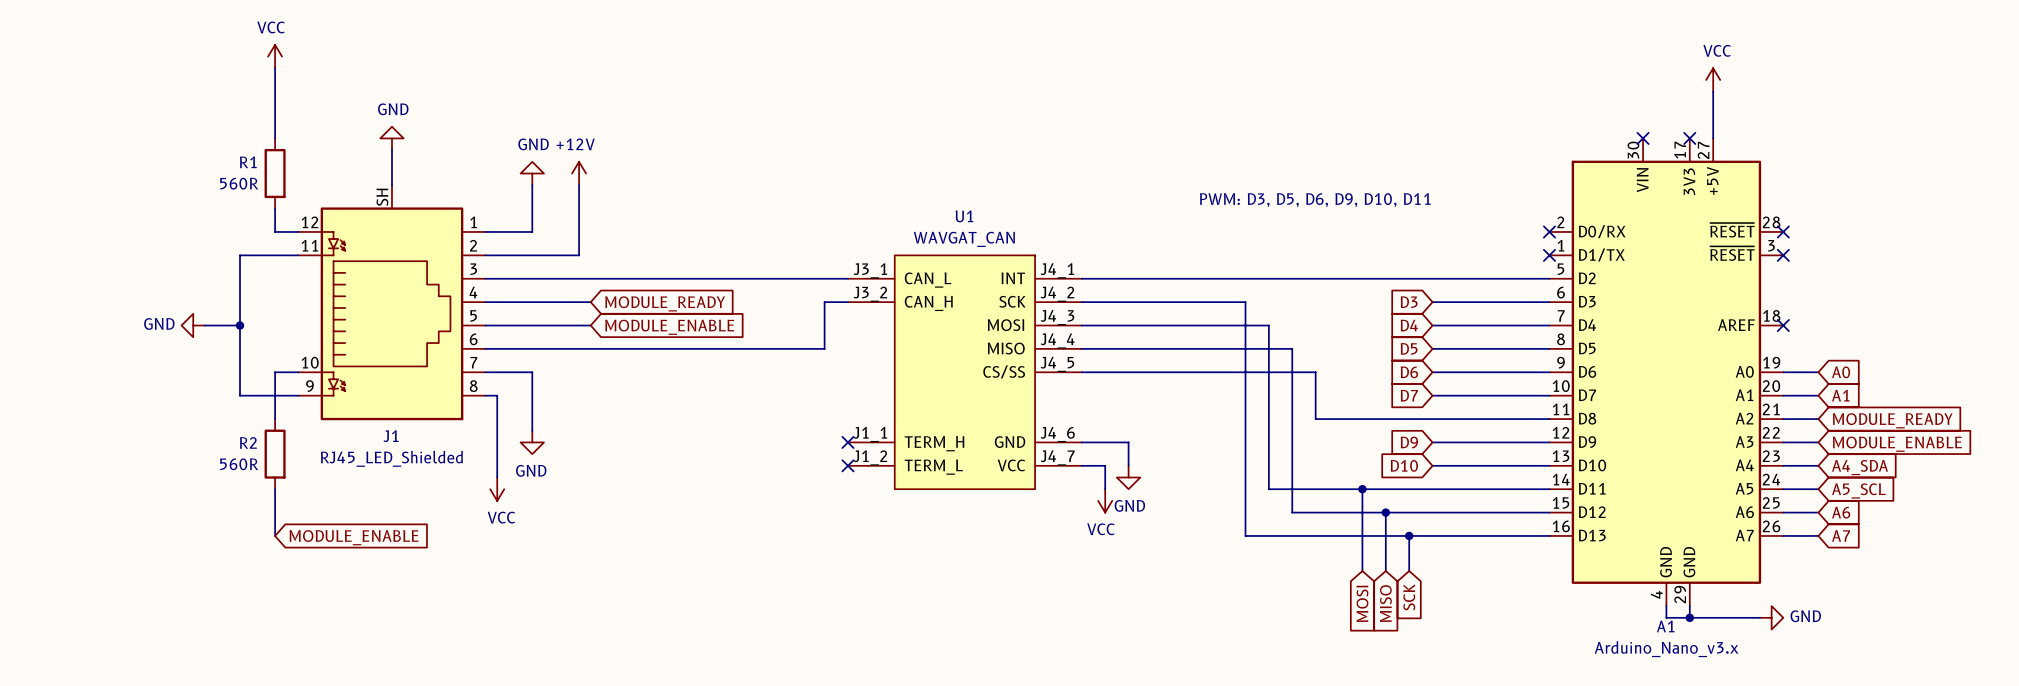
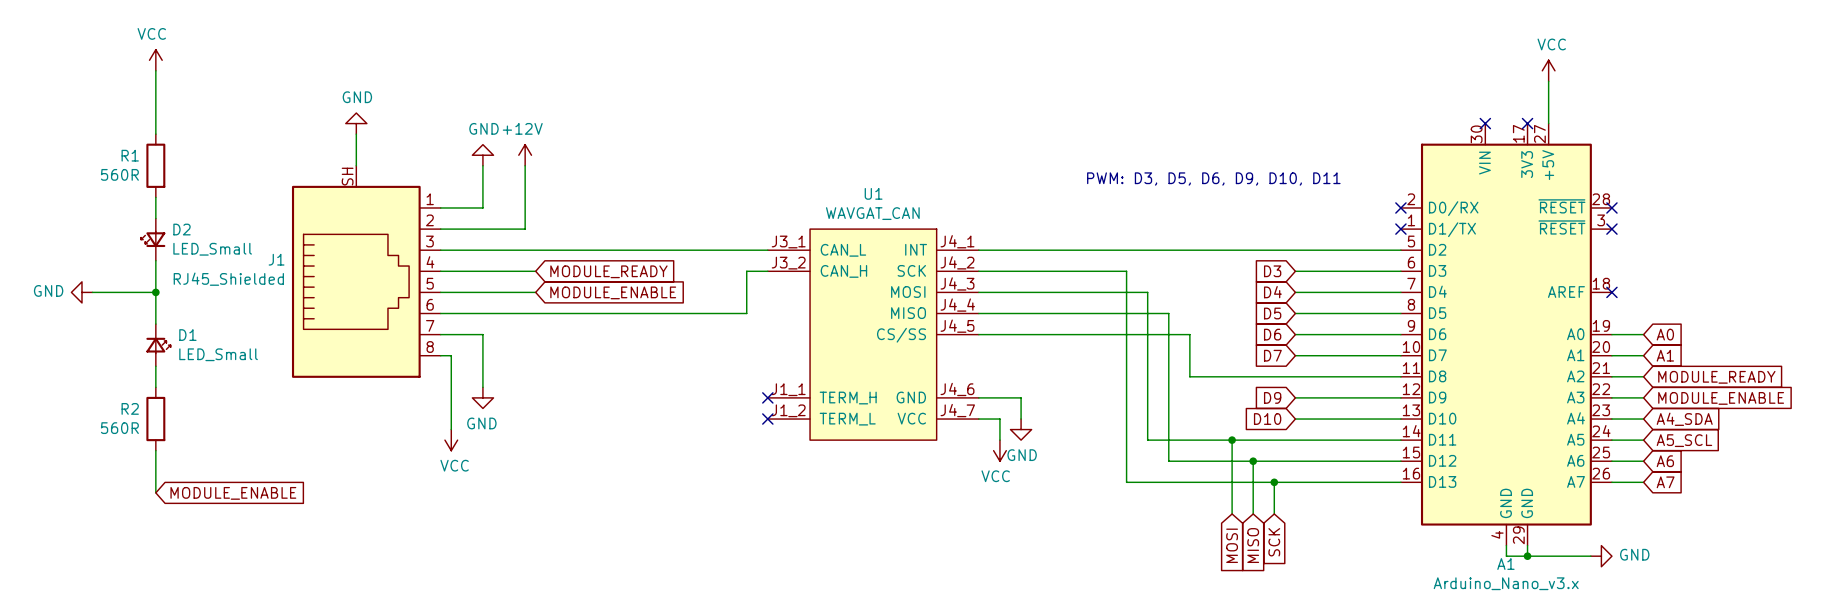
power symbol position: VCC (275, 56) -> VCC (155, 60)
wire: (275, 68) (275, 138) -> (155, 70) (155, 134)
R1 position: (275, 173) -> (155, 165)
J1 symbol: [298, 185, 486, 421] -> [291, 165, 441, 378]
wire: (275, 208) (275, 231) (298, 231) -> none
wire: none -> (155, 197) (155, 218)
wire: (298, 255) (240, 255) (240, 395) (298, 395) -> none
D2: none -> LED_Small (153, 239)
wire: none -> (155, 260) (155, 324)
wire: none -> (92, 292) (155, 292)
junction: none -> (155, 292)
power symbol position: GND (193, 325) -> GND (81, 292)
wire: (204, 325) (240, 325) -> none
junction: (240, 325) -> none
wire: (298, 372) (275, 372) (275, 419) -> none
D1: none -> LED_Small (158, 345)
wire: none -> (155, 366) (155, 387)
J1 name position: J1 (391, 436) -> J1 (276, 259)
R2 position: (275, 454) -> (155, 419)
J1 value: RJ45_LED_Shielded (391, 458) -> RJ45_Shielded (228, 279)
wire: (275, 489) (275, 535) -> (155, 450) (155, 492)
global label position: MODULE_ENABLE (354, 537) -> MODULE_ENABLE (233, 493)

